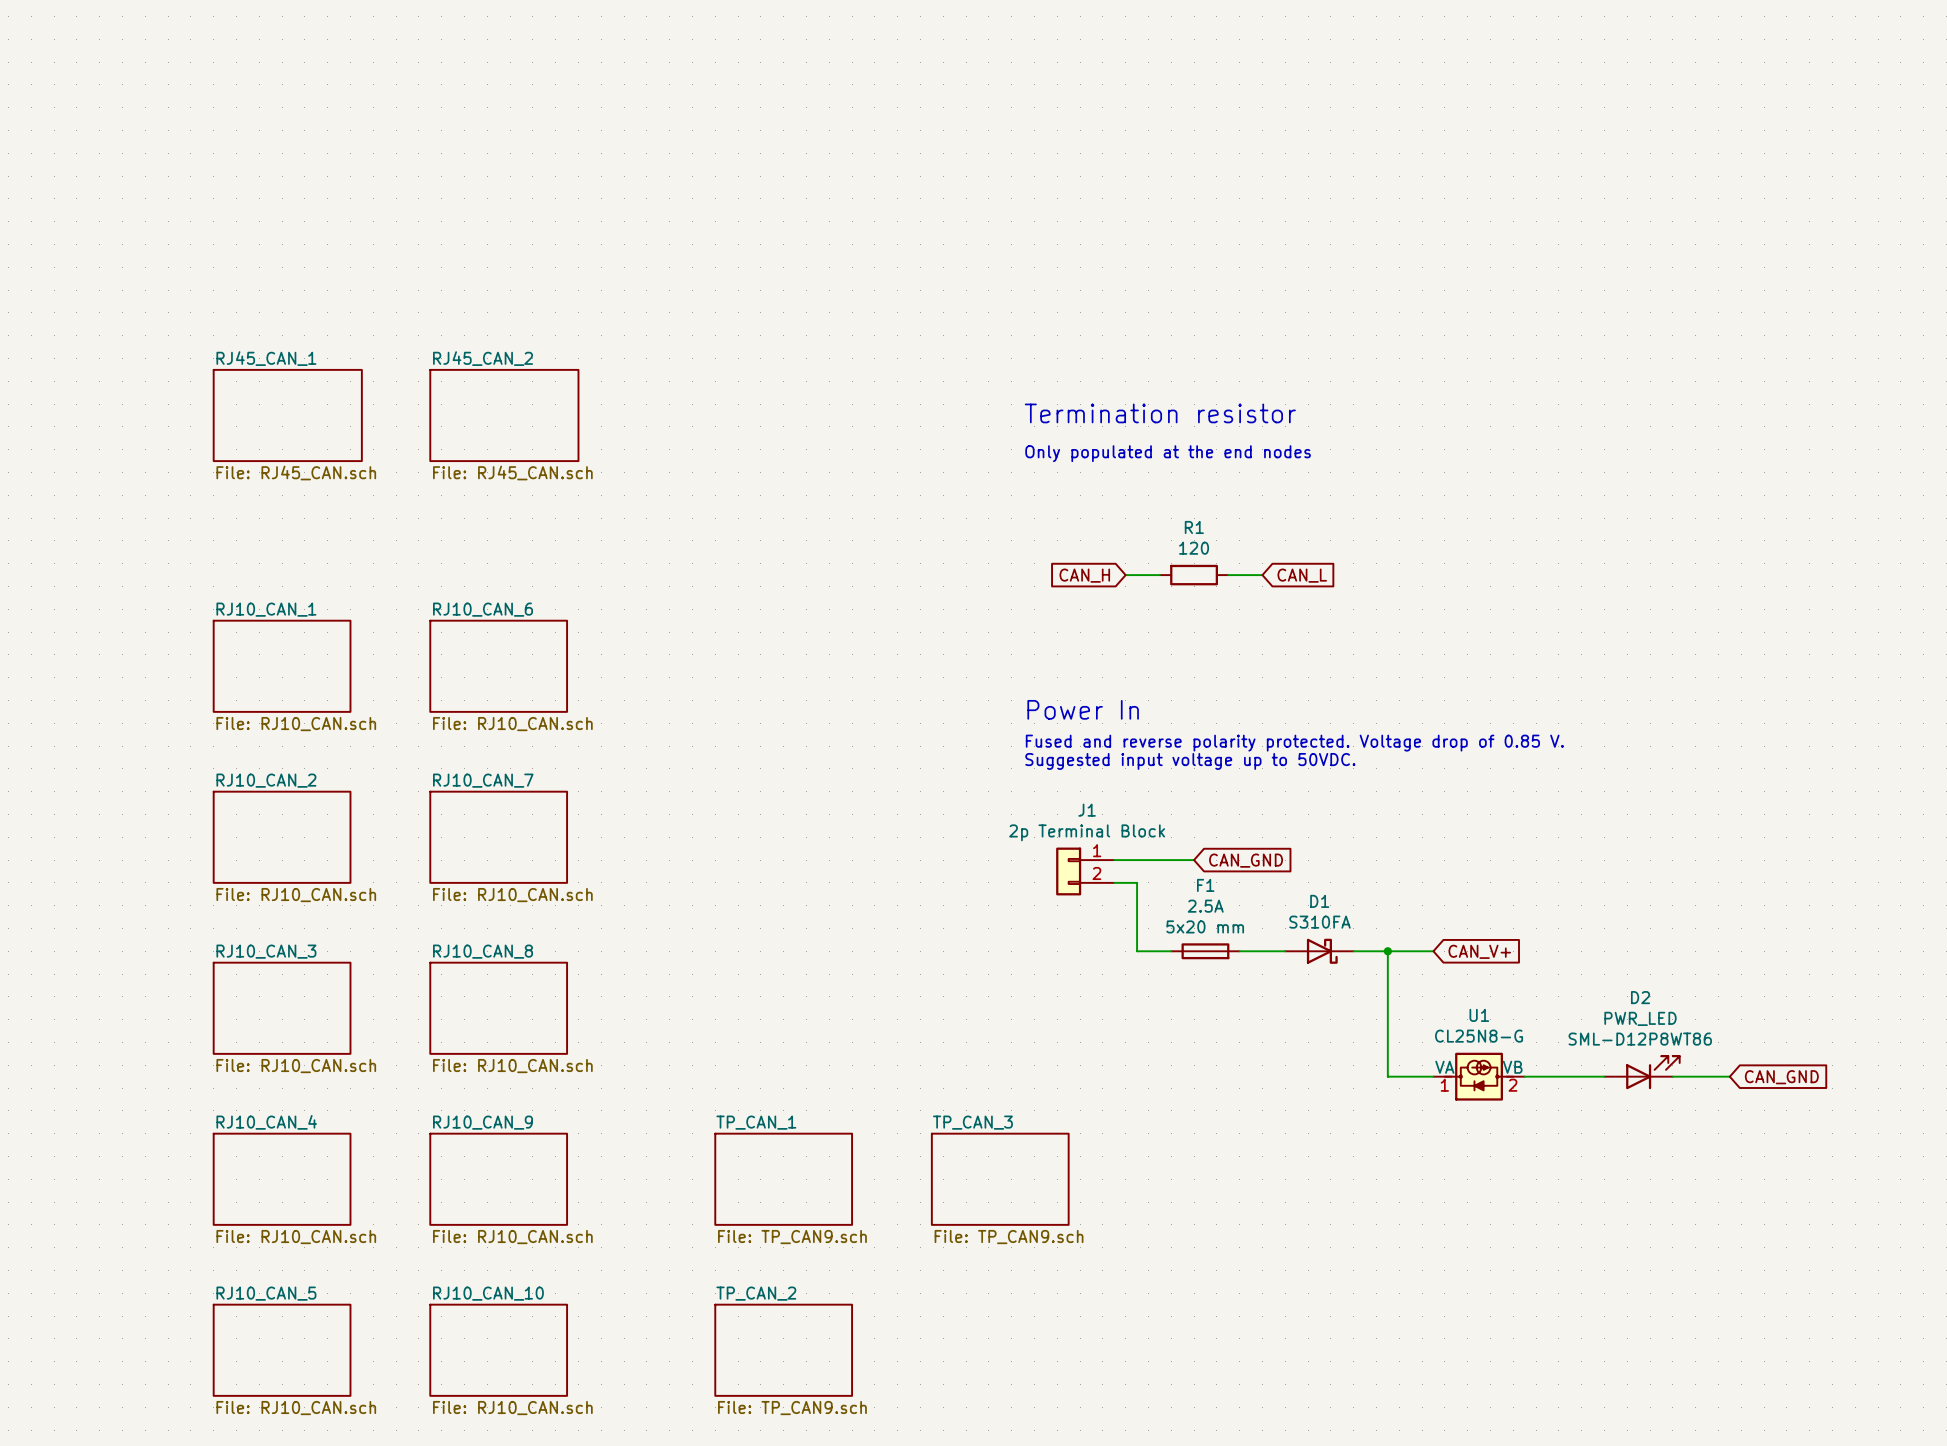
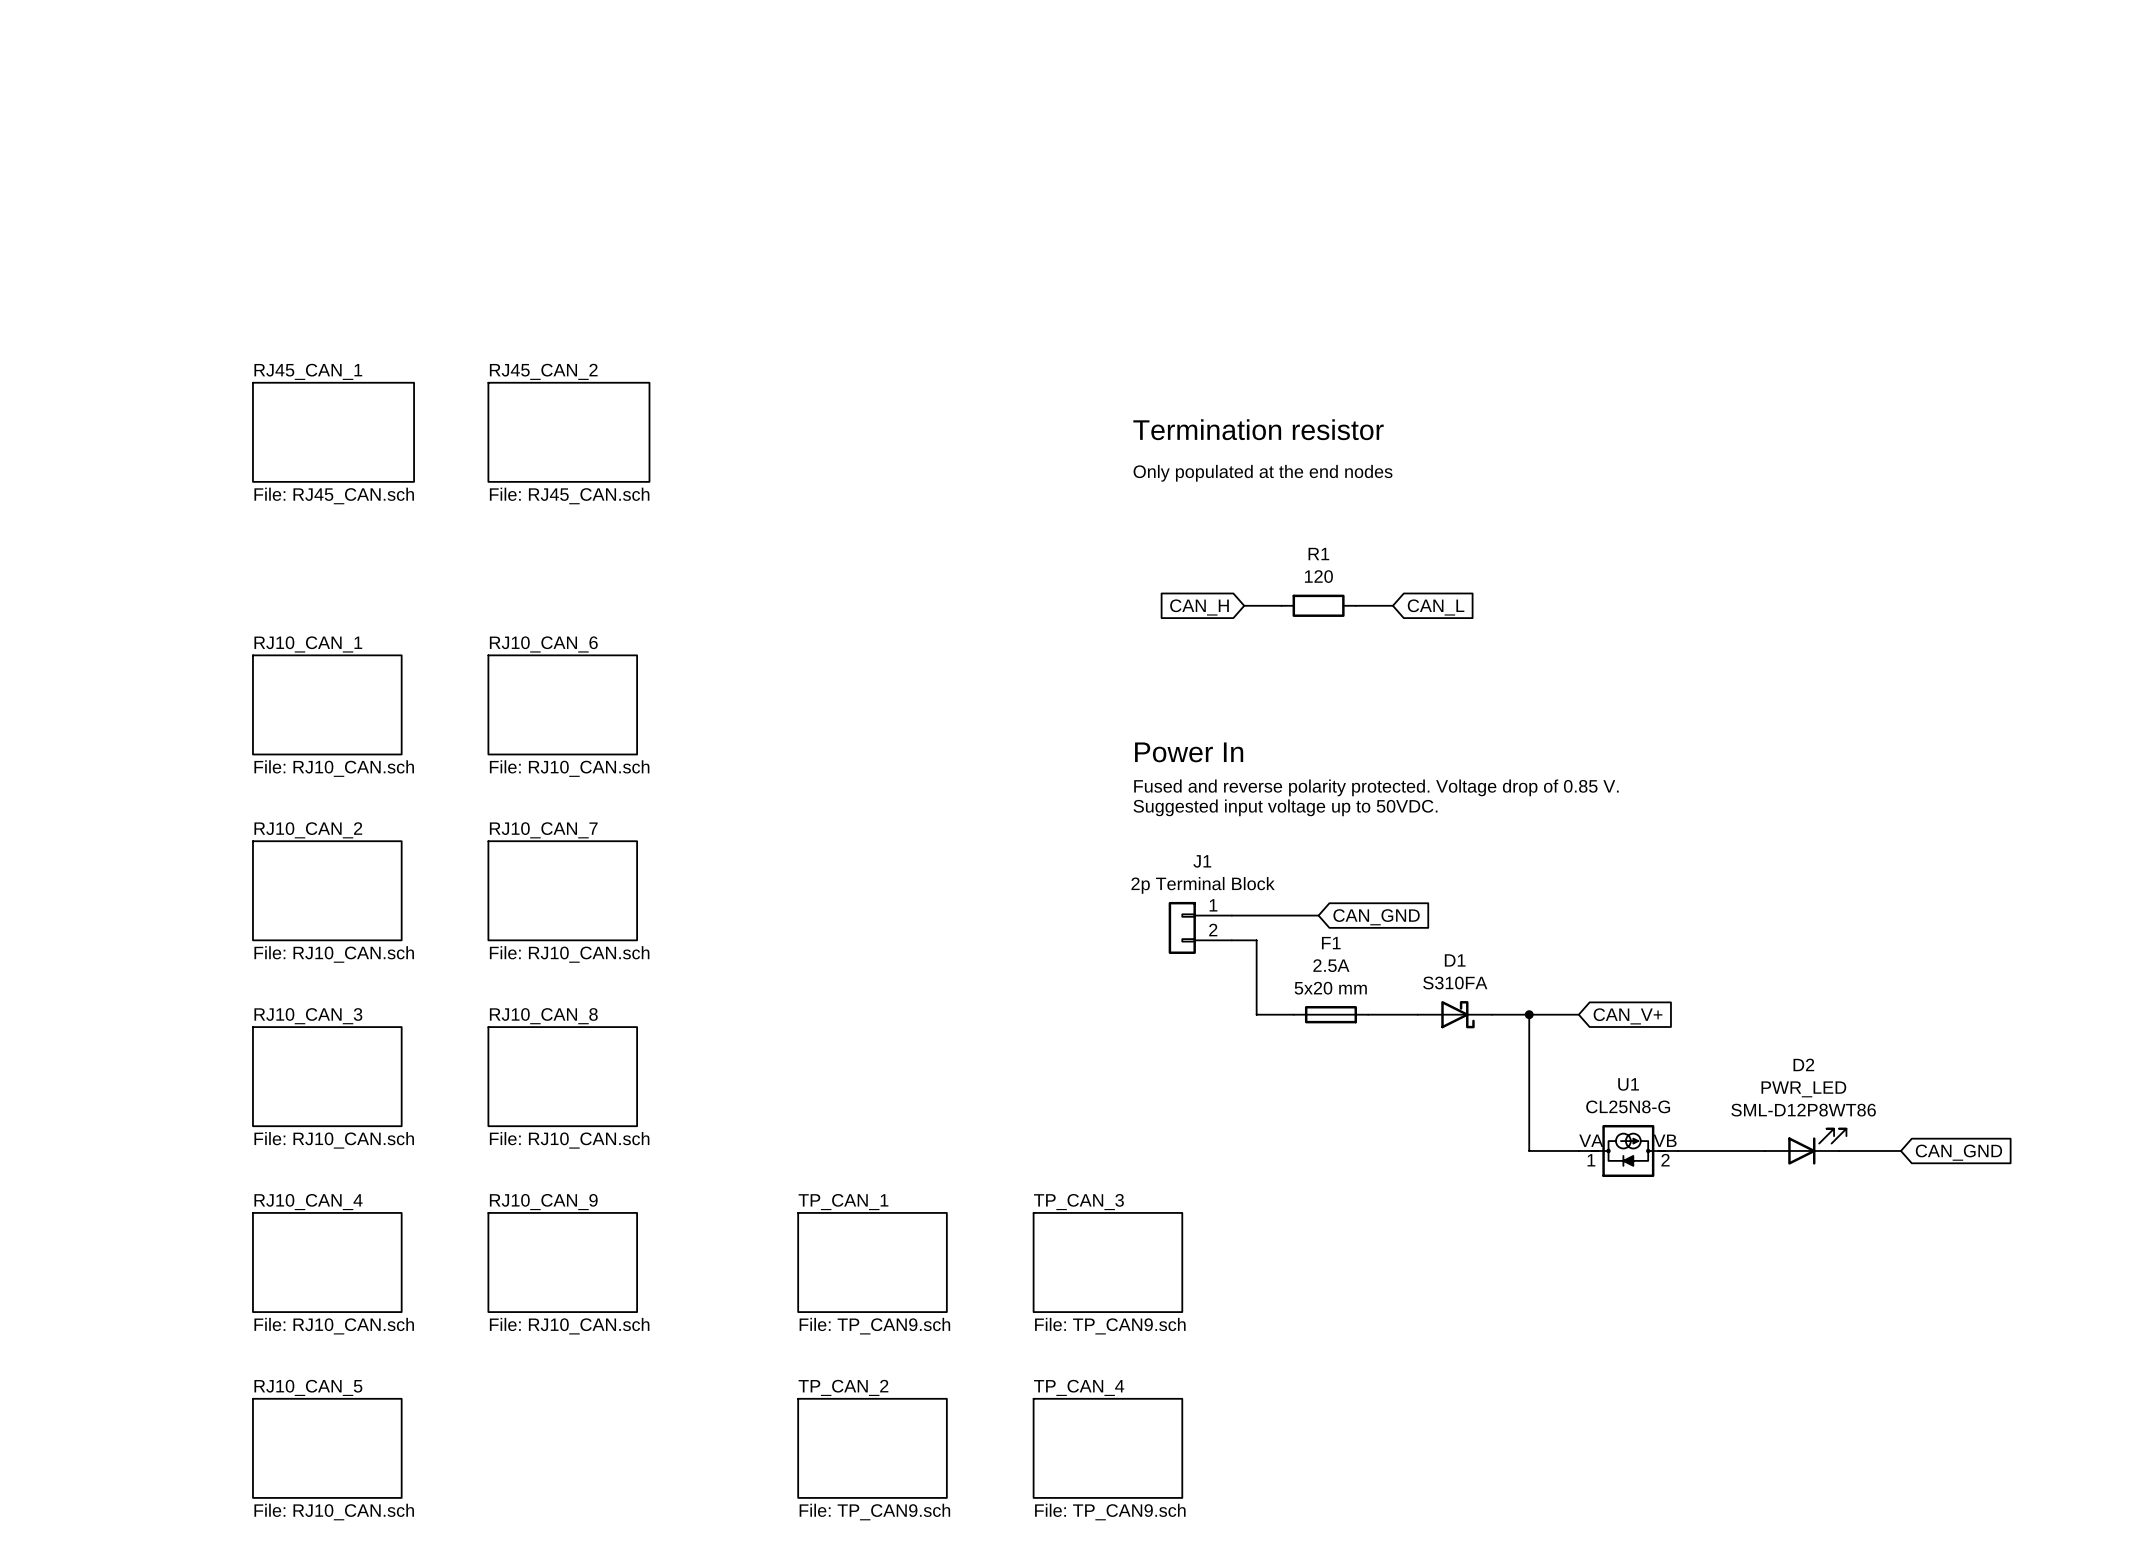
sheet RJ10_CAN_10: File: RJ10_CAN.sch (498, 1350) -> none
sheet TP_CAN_4: none -> File: TP_CAN9.sch (1107, 1448)

